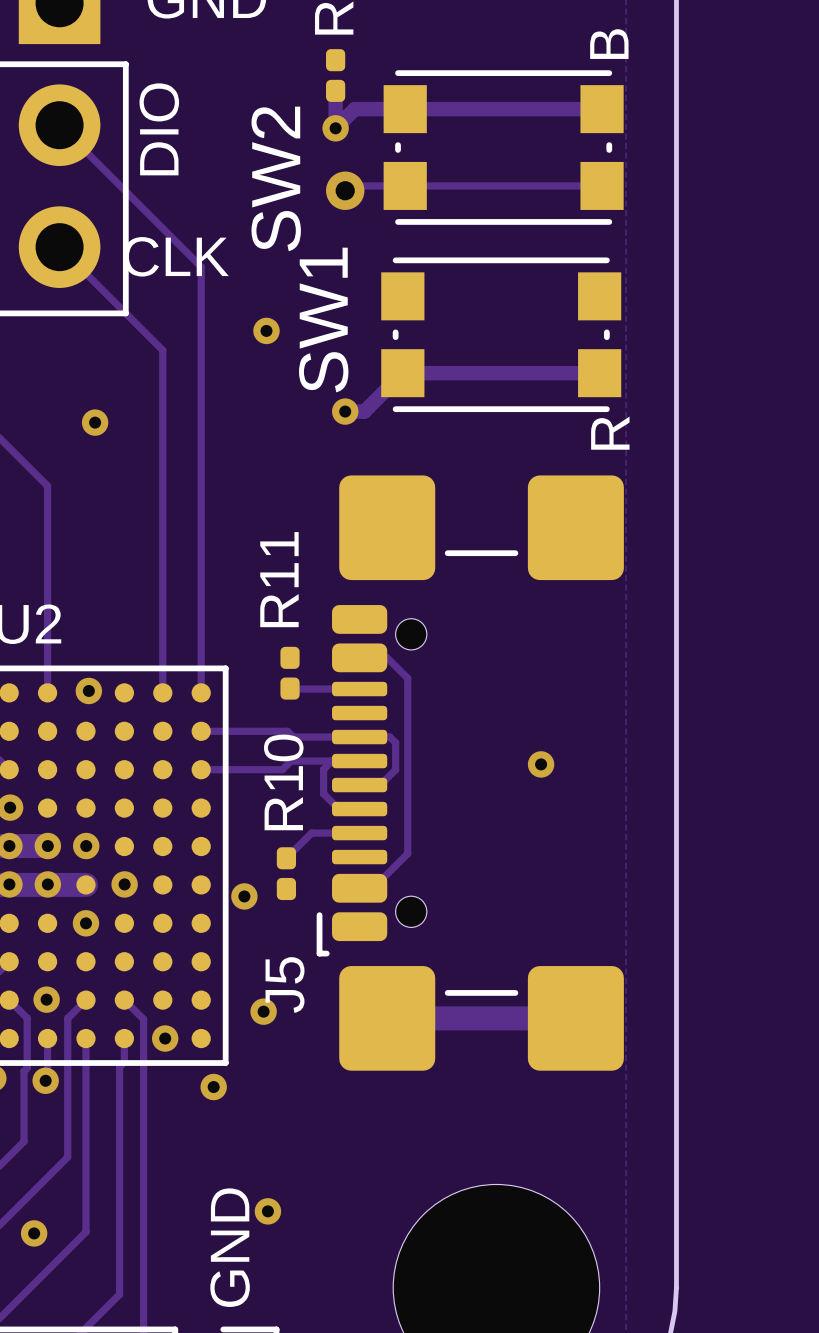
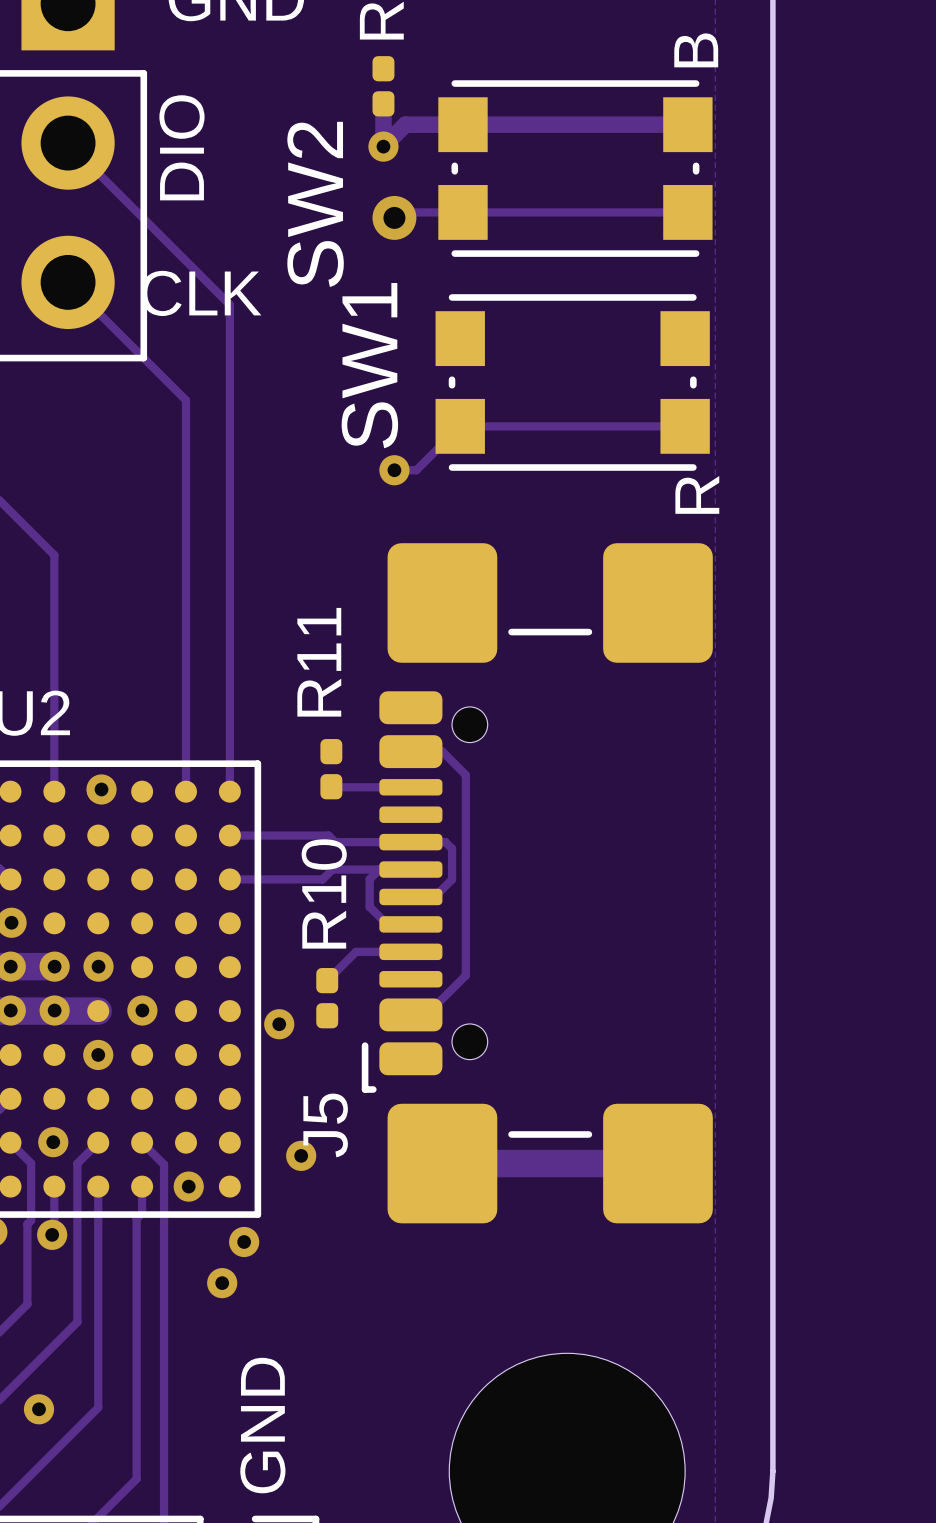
via: (266, 330) -> none
track width: thick (599, 373) (402, 373) (364, 411) (345, 411) -> thin (685, 426) (460, 426) (416, 470) (394, 470)
via: (95, 422) -> none
via: (541, 764) -> none
via position: (267, 1211) -> (222, 1283)

